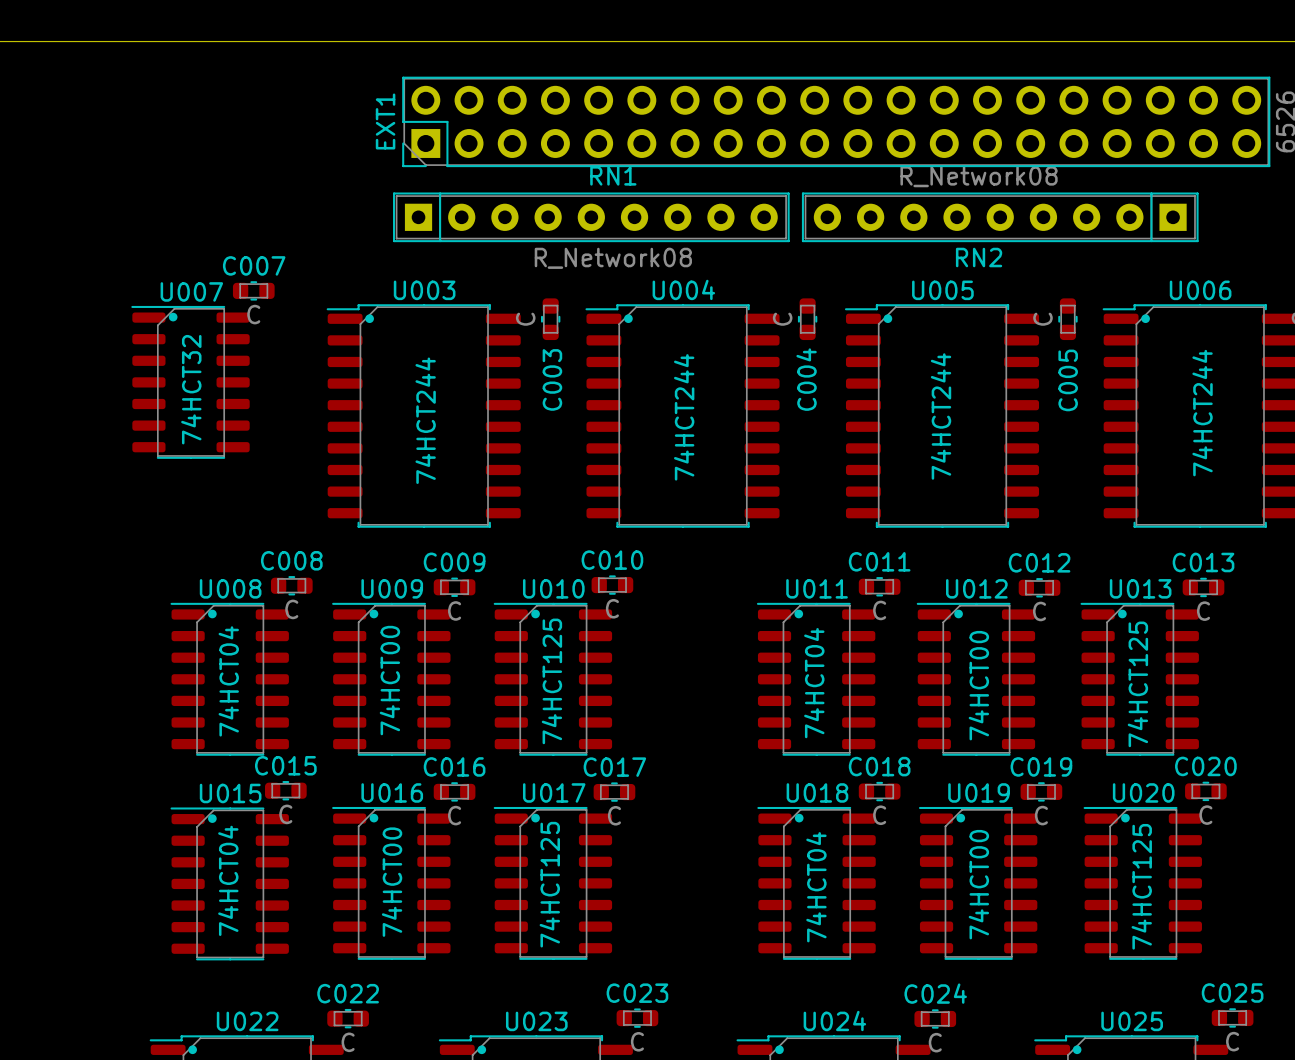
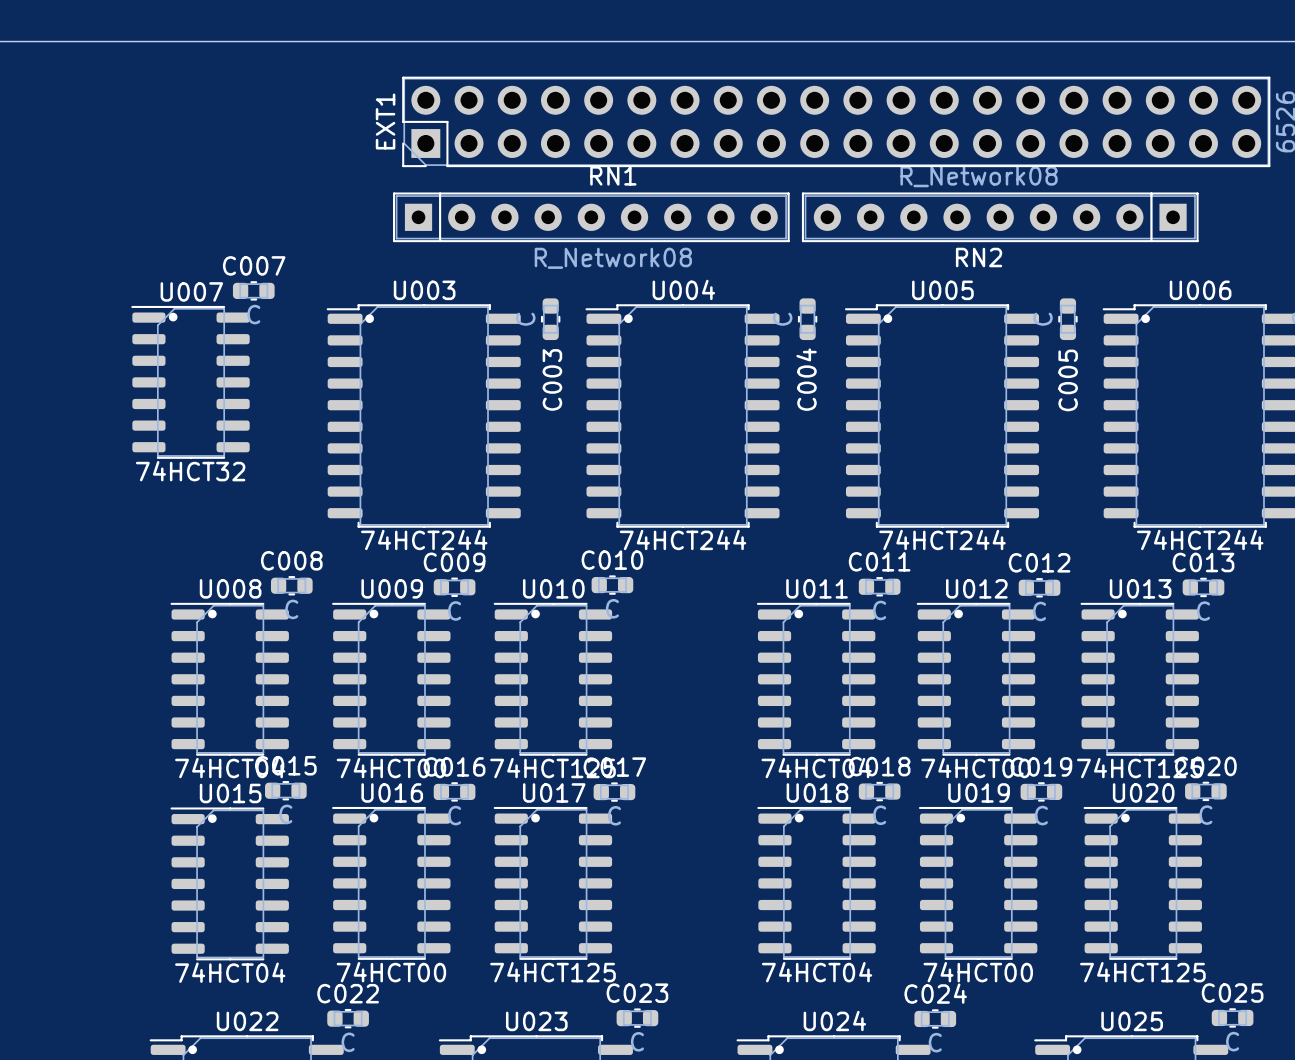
U007 value rotation: 0° (191, 389) -> 90° clockwise (190, 471)
U006 value rotation: 0° (1202, 413) -> 90° clockwise (1200, 539)
U005 value rotation: 0° (941, 416) -> 90° clockwise (942, 539)
U004 value rotation: 0° (684, 417) -> 90° clockwise (683, 539)
U003 value rotation: 0° (425, 420) -> 90° clockwise (424, 539)
U009 value rotation: 0° (389, 680) -> 90° clockwise (391, 768)
U008 value rotation: 0° (228, 681) -> 90° clockwise (230, 768)
U010 value rotation: 0° (551, 681) -> 90° clockwise (553, 768)
U011 value rotation: 0° (814, 683) -> 90° clockwise (816, 768)
U013 value rotation: 0° (1137, 684) -> 90° clockwise (1139, 768)
U012 value rotation: 0° (978, 685) -> 90° clockwise (976, 768)
U015 value rotation: 0° (228, 880) -> 90° clockwise (230, 972)
U016 value rotation: 0° (392, 882) -> 90° clockwise (391, 972)
U017 value rotation: 0° (549, 884) -> 90° clockwise (553, 972)
U019 value rotation: 0° (978, 884) -> 90° clockwise (978, 972)
U020 value rotation: 0° (1141, 886) -> 90° clockwise (1142, 972)
U018 value rotation: 0° (816, 887) -> 90° clockwise (817, 972)

